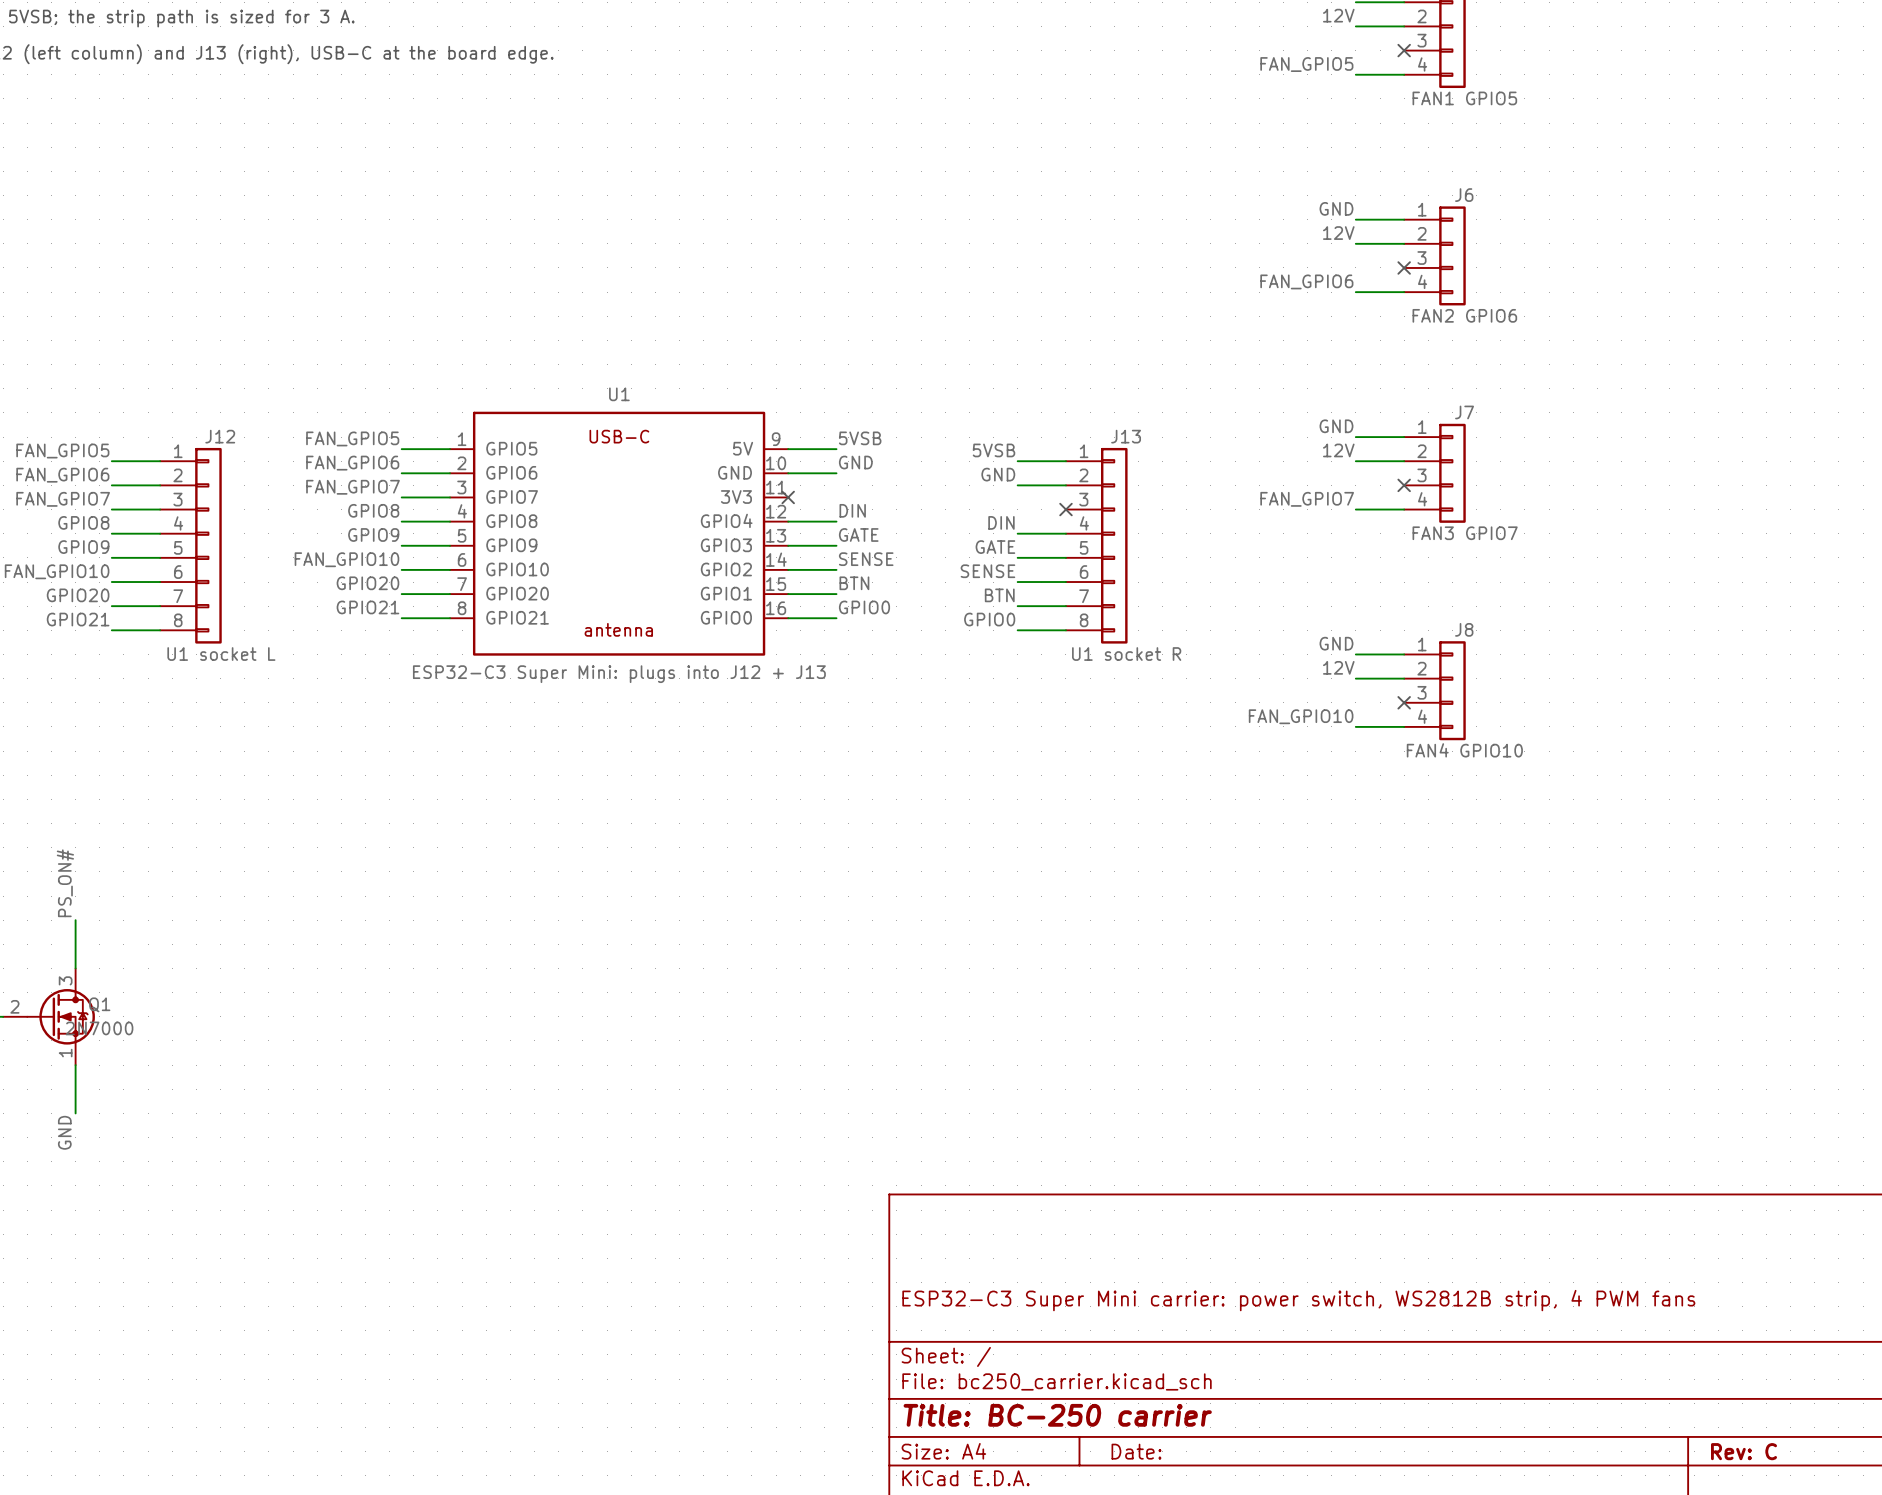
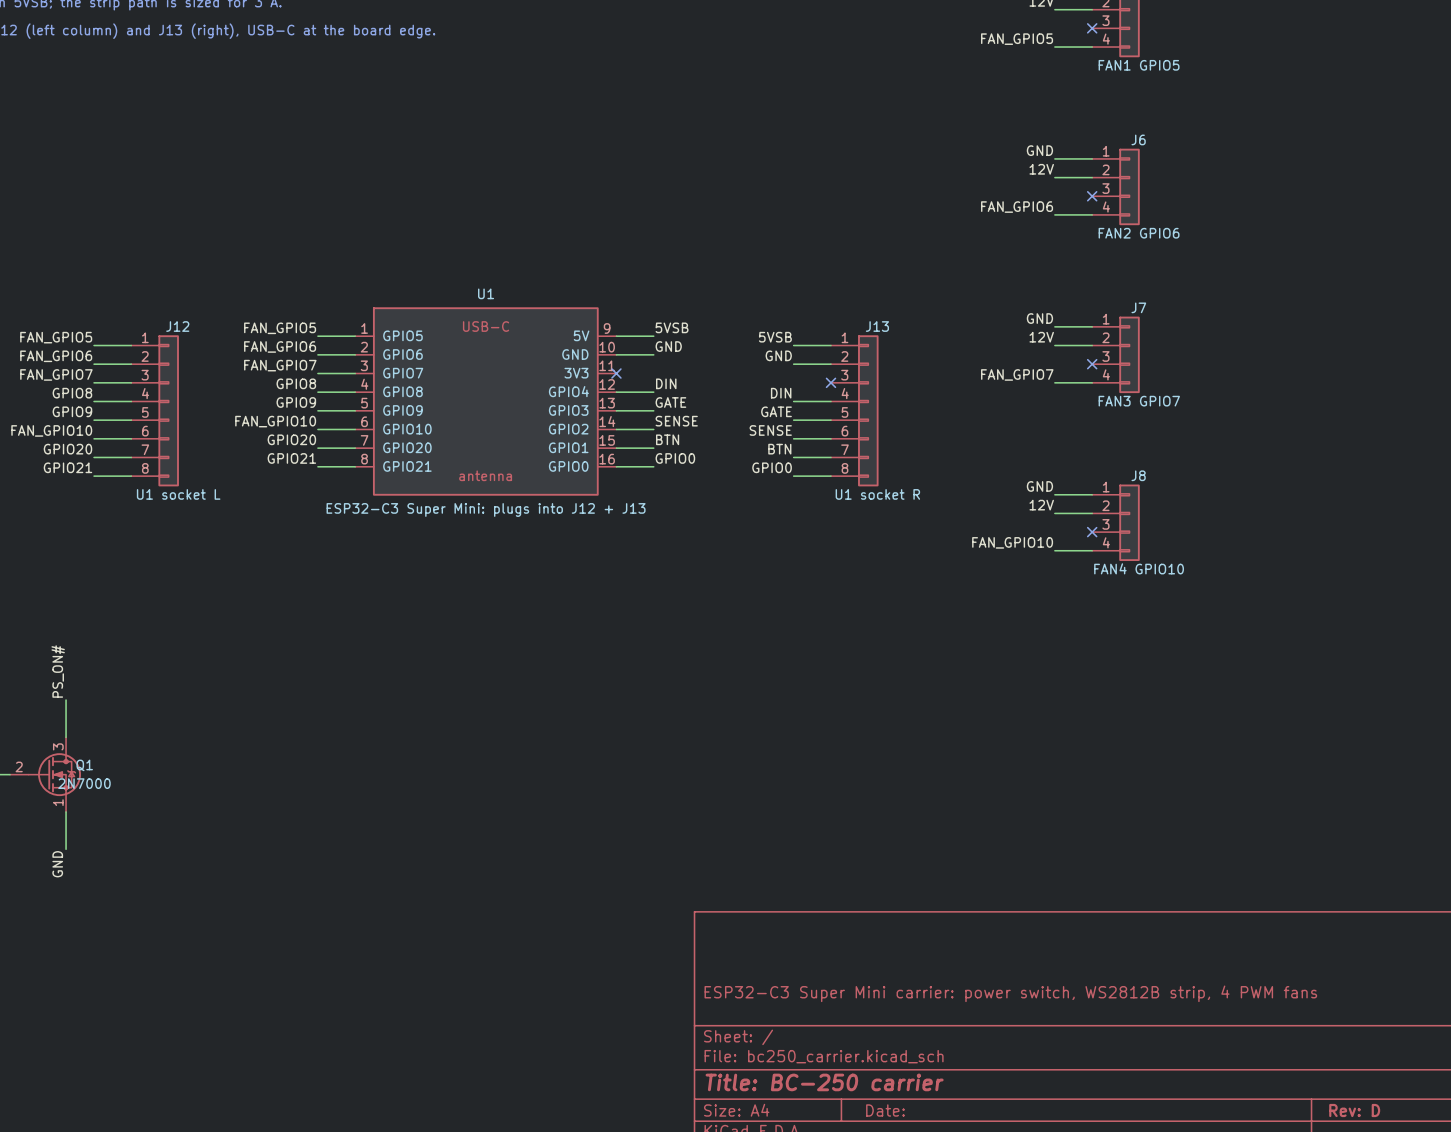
title block: Rev: C (1744, 1451) -> Rev: D (1354, 1110)

